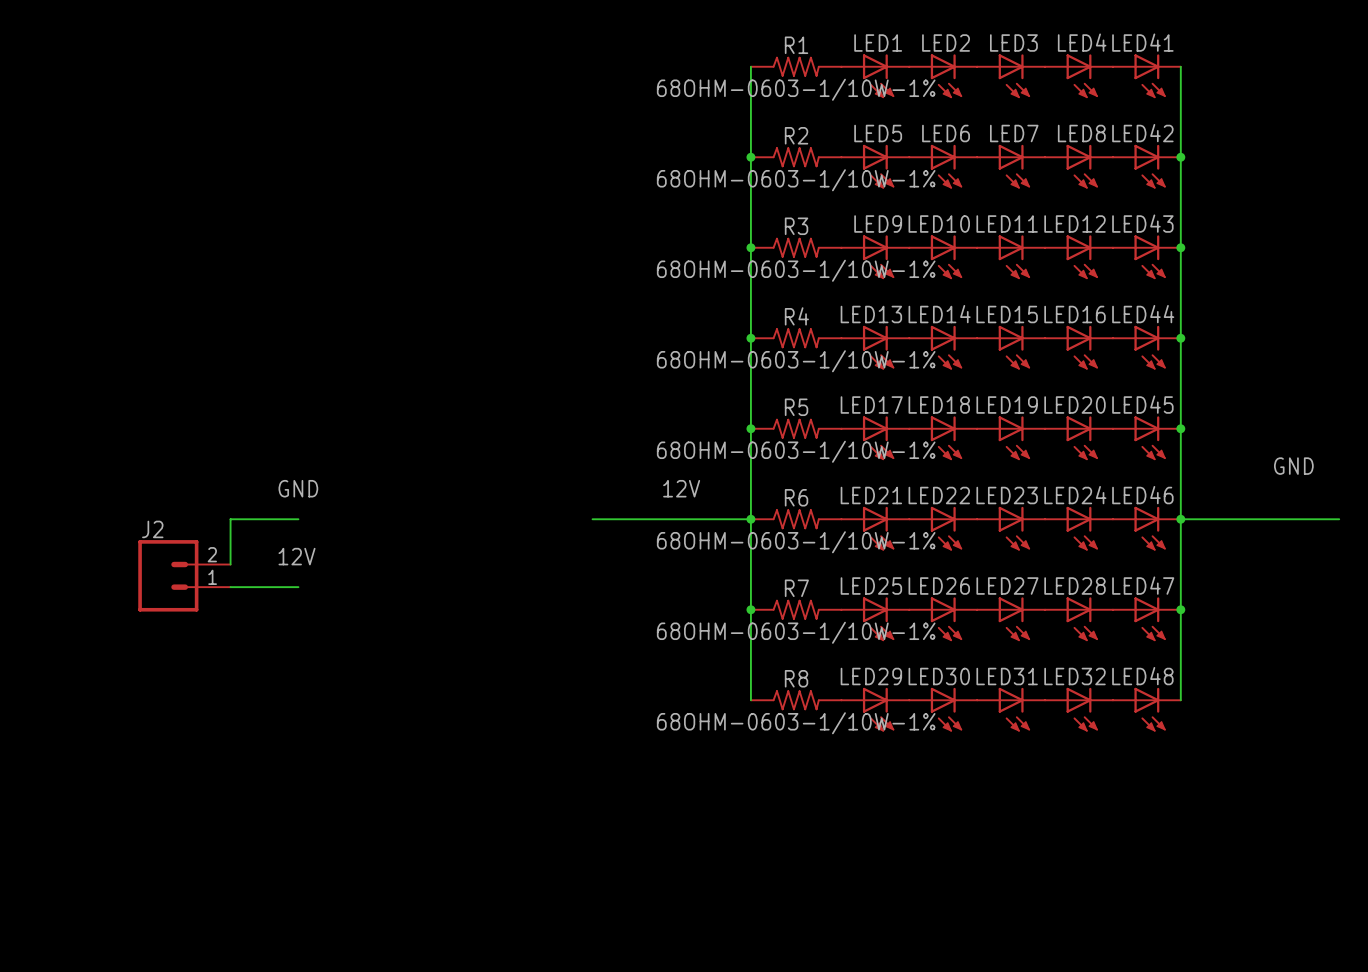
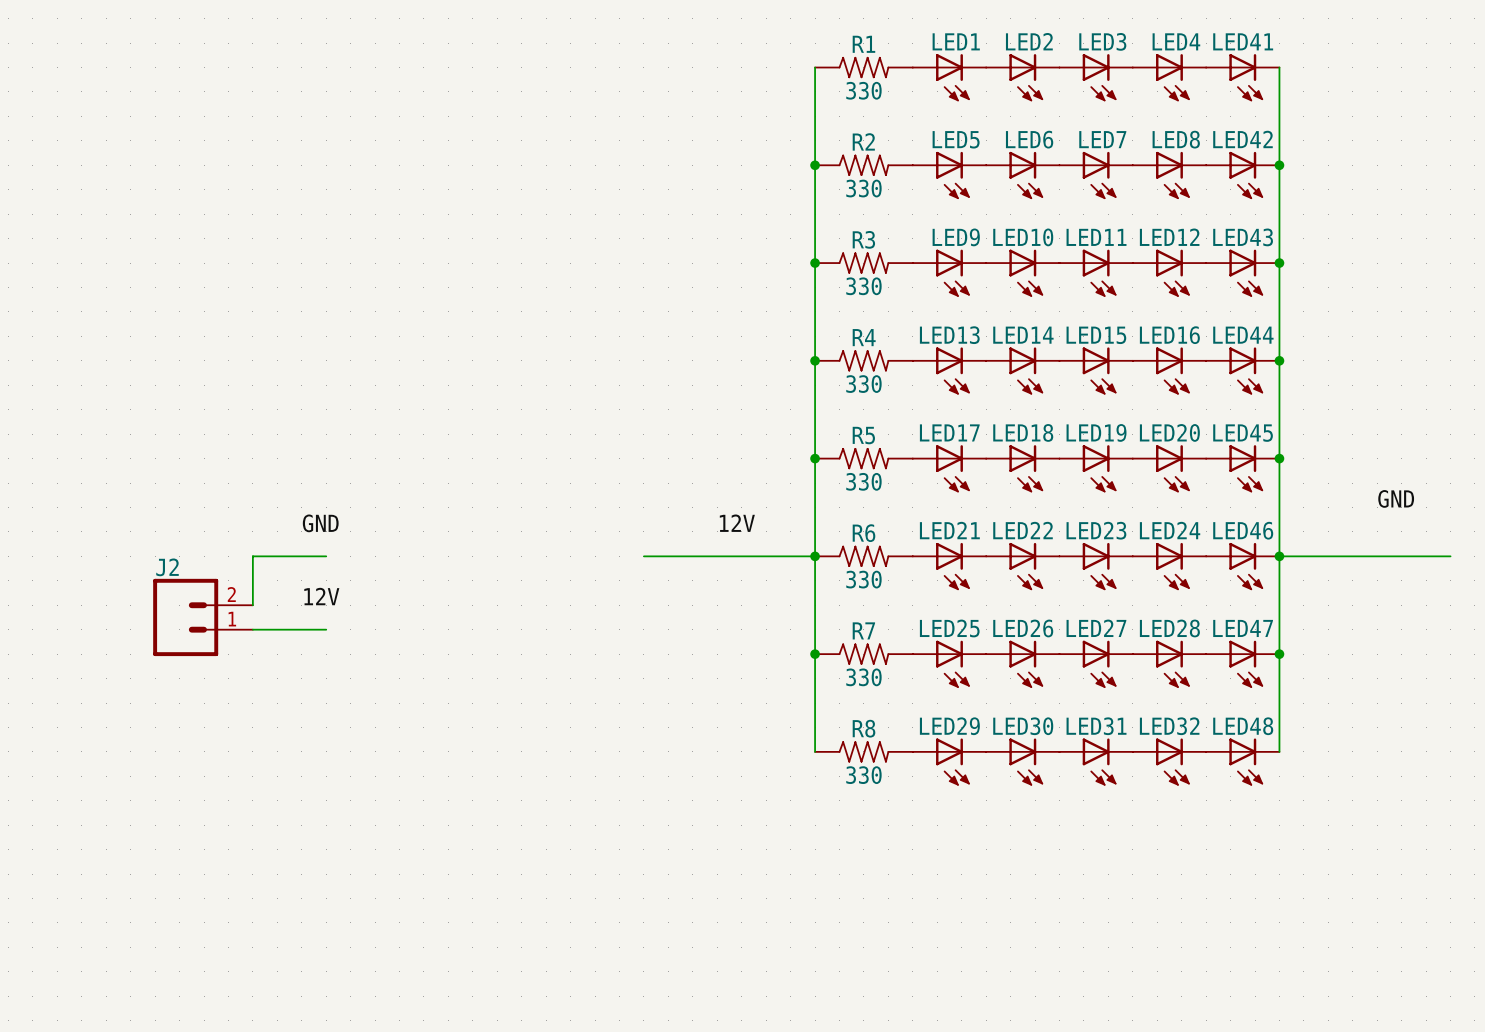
R1 value: 68OHM-0603-1/10W-1% (796, 89) -> 330 (863, 90)
R2 value: 68OHM-0603-1/10W-1% (796, 180) -> 330 (863, 188)
R3 value: 68OHM-0603-1/10W-1% (796, 270) -> 330 (863, 286)
R4 value: 68OHM-0603-1/10W-1% (796, 361) -> 330 (863, 384)
R5 value: 68OHM-0603-1/10W-1% (796, 451) -> 330 (863, 481)
R6 value: 68OHM-0603-1/10W-1% (796, 542) -> 330 (863, 579)
R7 value: 68OHM-0603-1/10W-1% (796, 632) -> 330 (863, 677)
R8 value: 68OHM-0603-1/10W-1% (796, 723) -> 330 (863, 775)

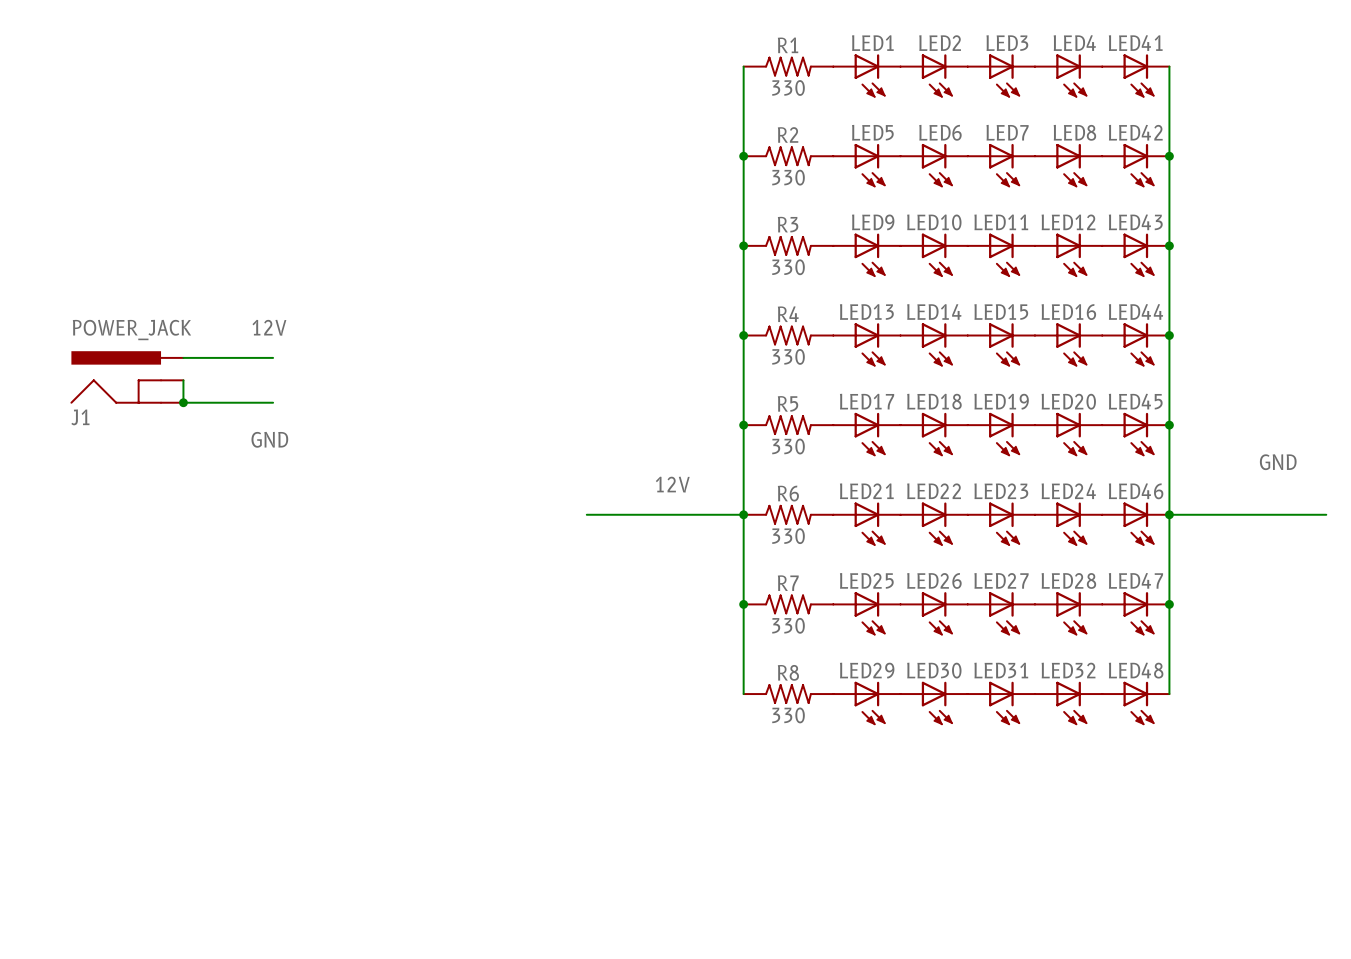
label: none -> 12V (269, 327)
wire: none -> (183, 357) (273, 357)
J1: none -> POWER_JACK (127, 377)
wire: none -> (183, 380) (183, 402) (273, 402)
junction: none -> (183, 402)
label position: GND (320, 523) -> GND (269, 439)
wire: (326, 556) (252, 556) (252, 605) -> none
label: 12V (321, 596) -> none
J2: (203, 617) -> none
wire: (252, 629) (326, 629) -> none

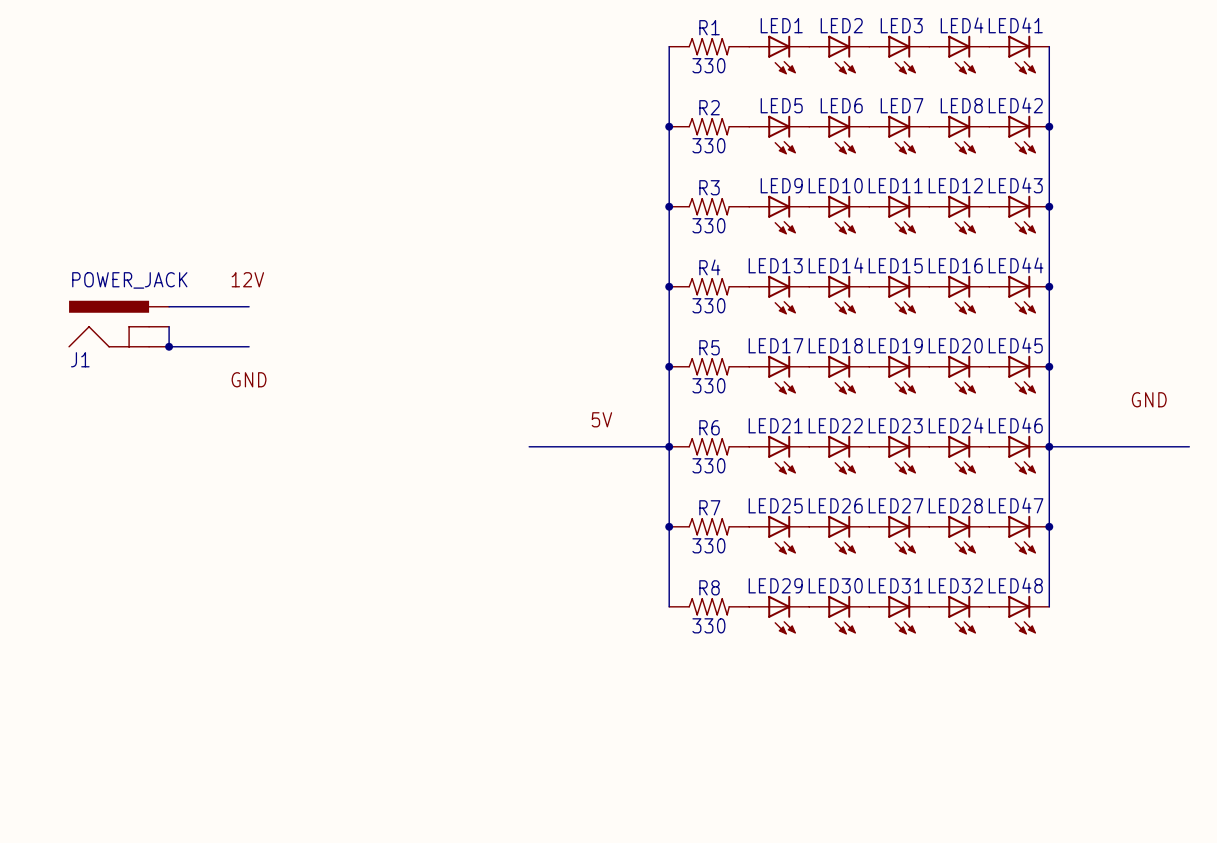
label: 12V (672, 484) -> 5V (601, 419)

